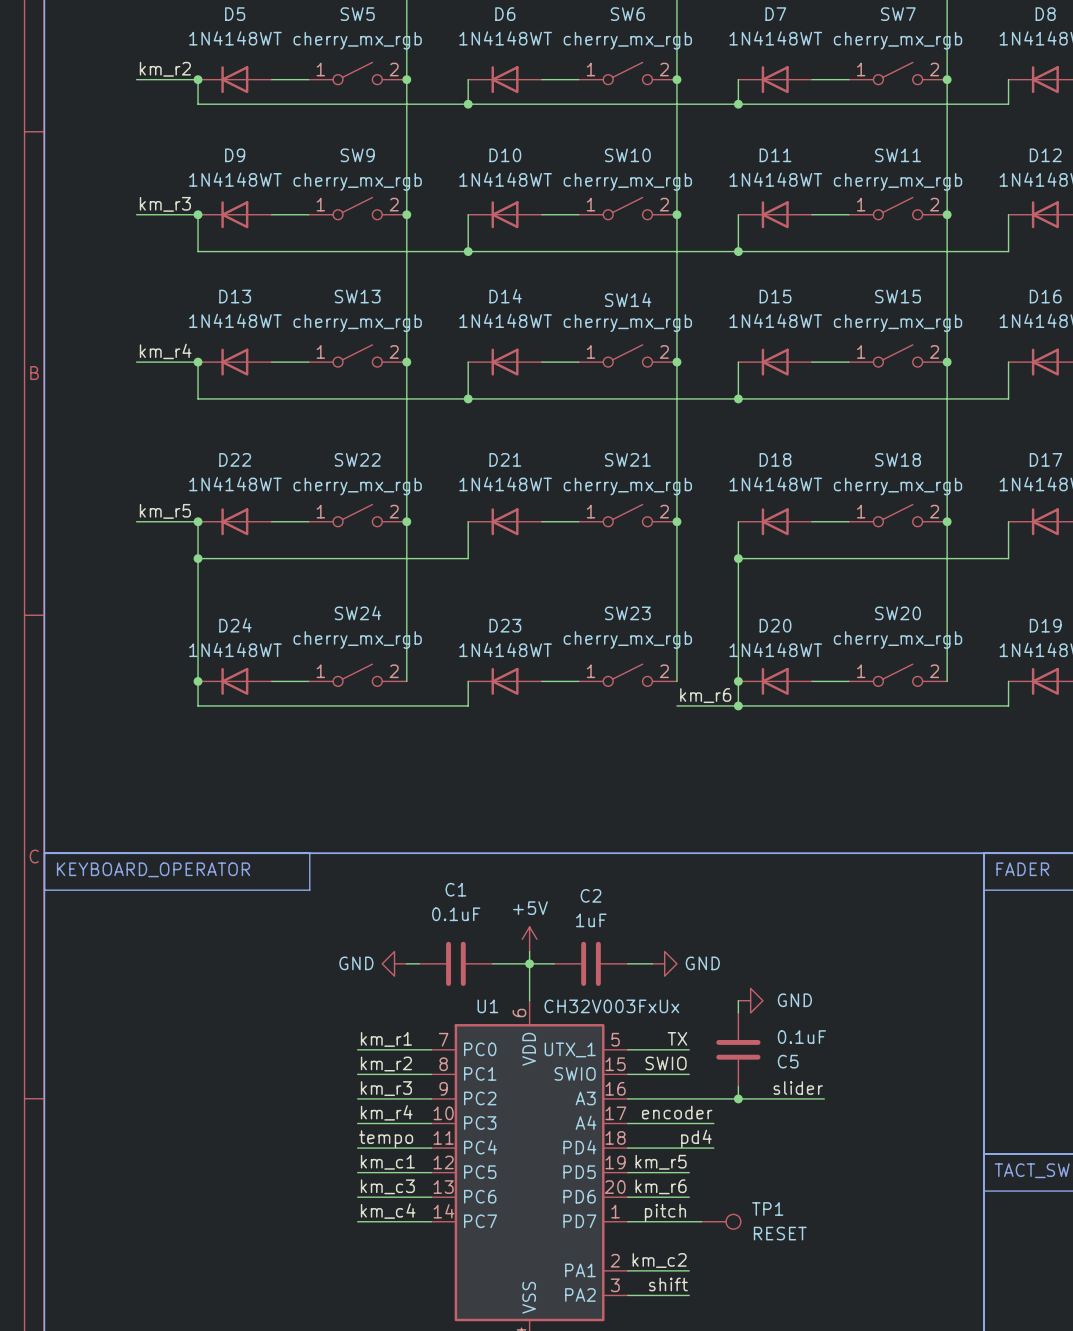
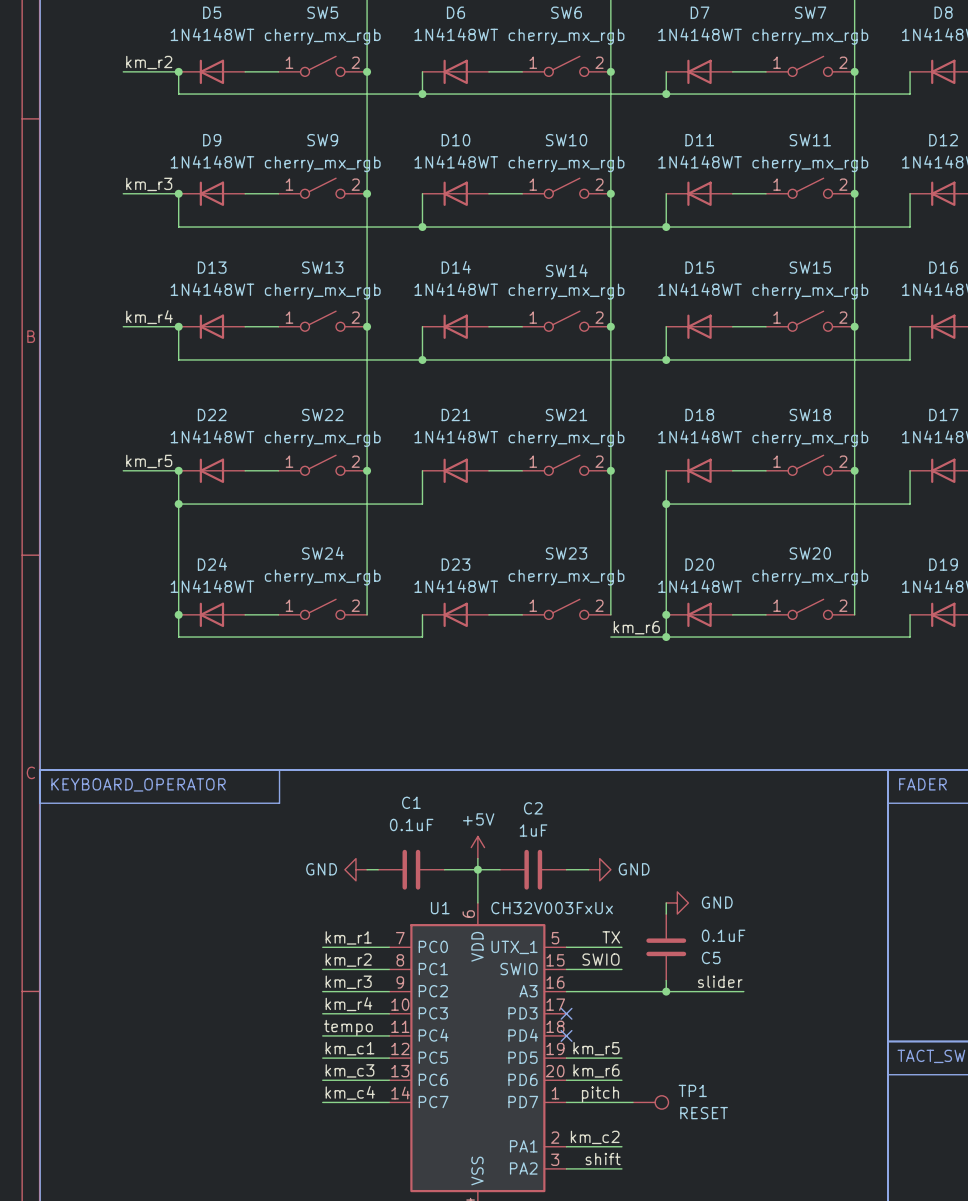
label: encoder (677, 1112) -> none
U1 pin name: A4 (586, 1122) -> PD3 (522, 1013)
wire: (627, 1123) (713, 1123) -> none
no-connect mark: none -> (566, 1013)
label: pd4 (696, 1138) -> none
wire: (627, 1148) (713, 1148) -> none
no-connect mark: none -> (566, 1035)

